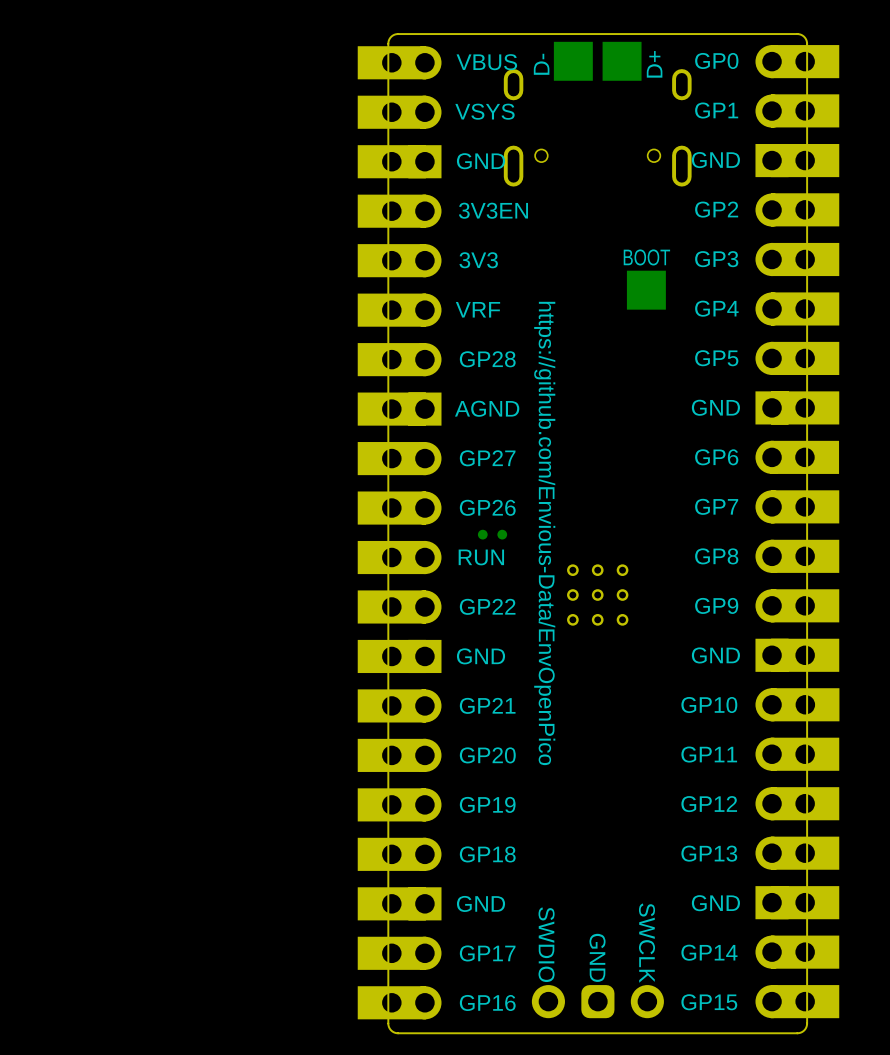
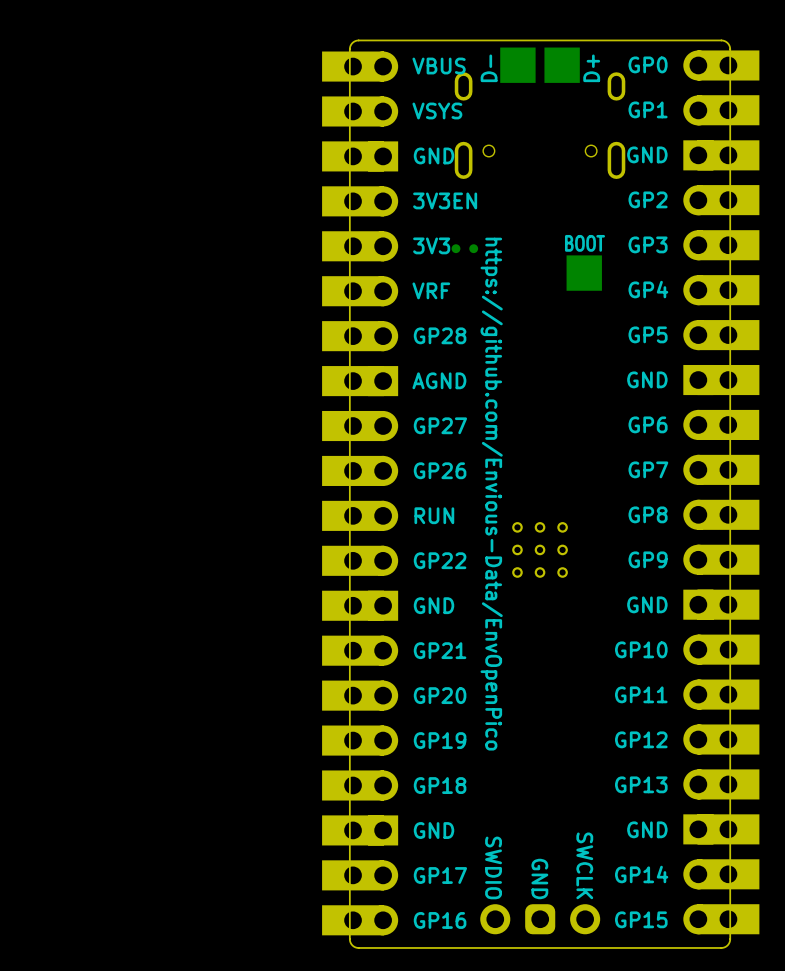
part position: (492, 534) -> (464, 248)

